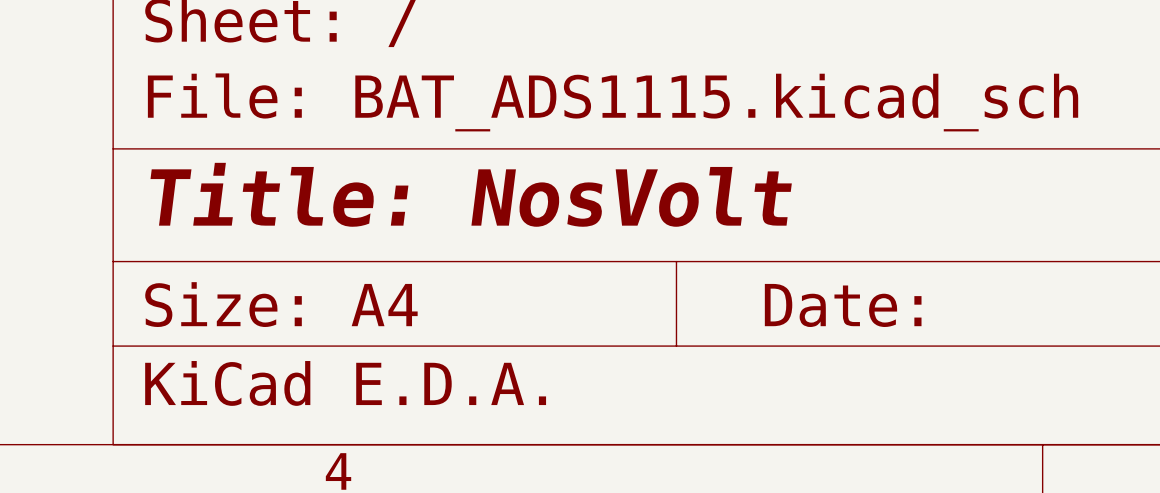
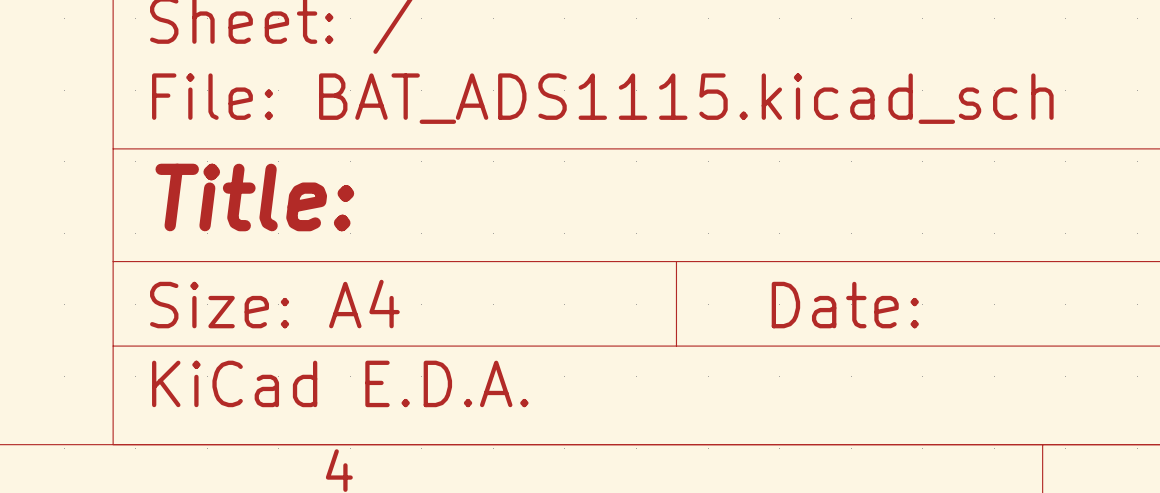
title block: Title: NosVolt (471, 194) -> Title: (254, 197)

